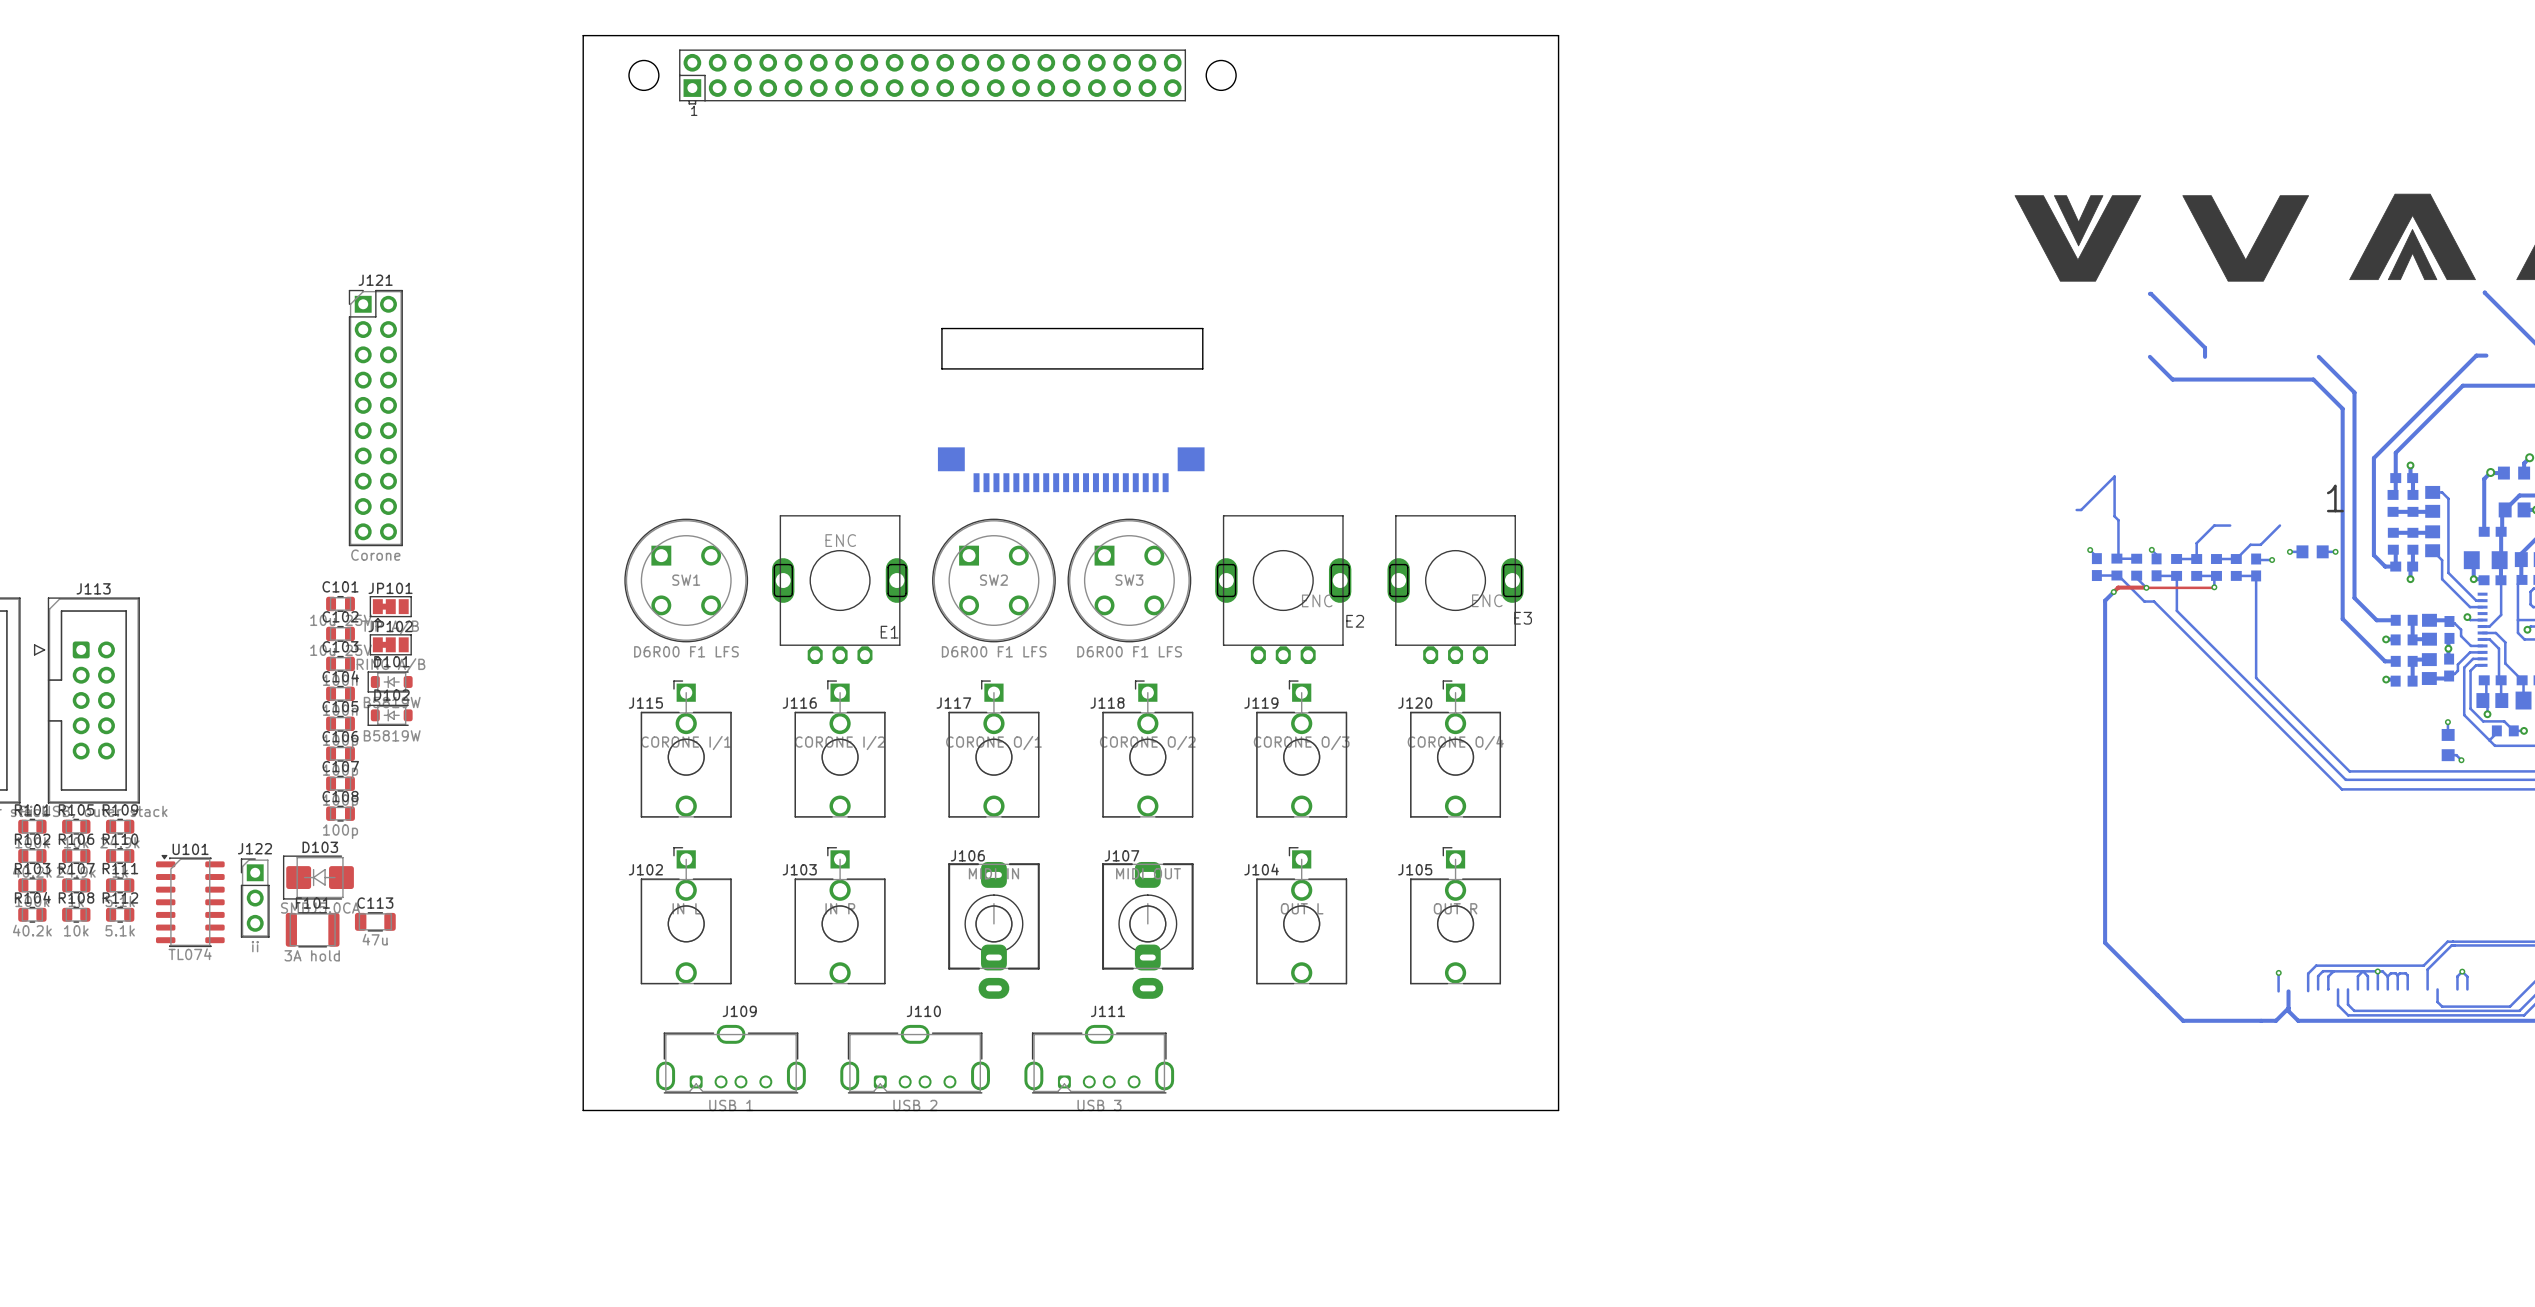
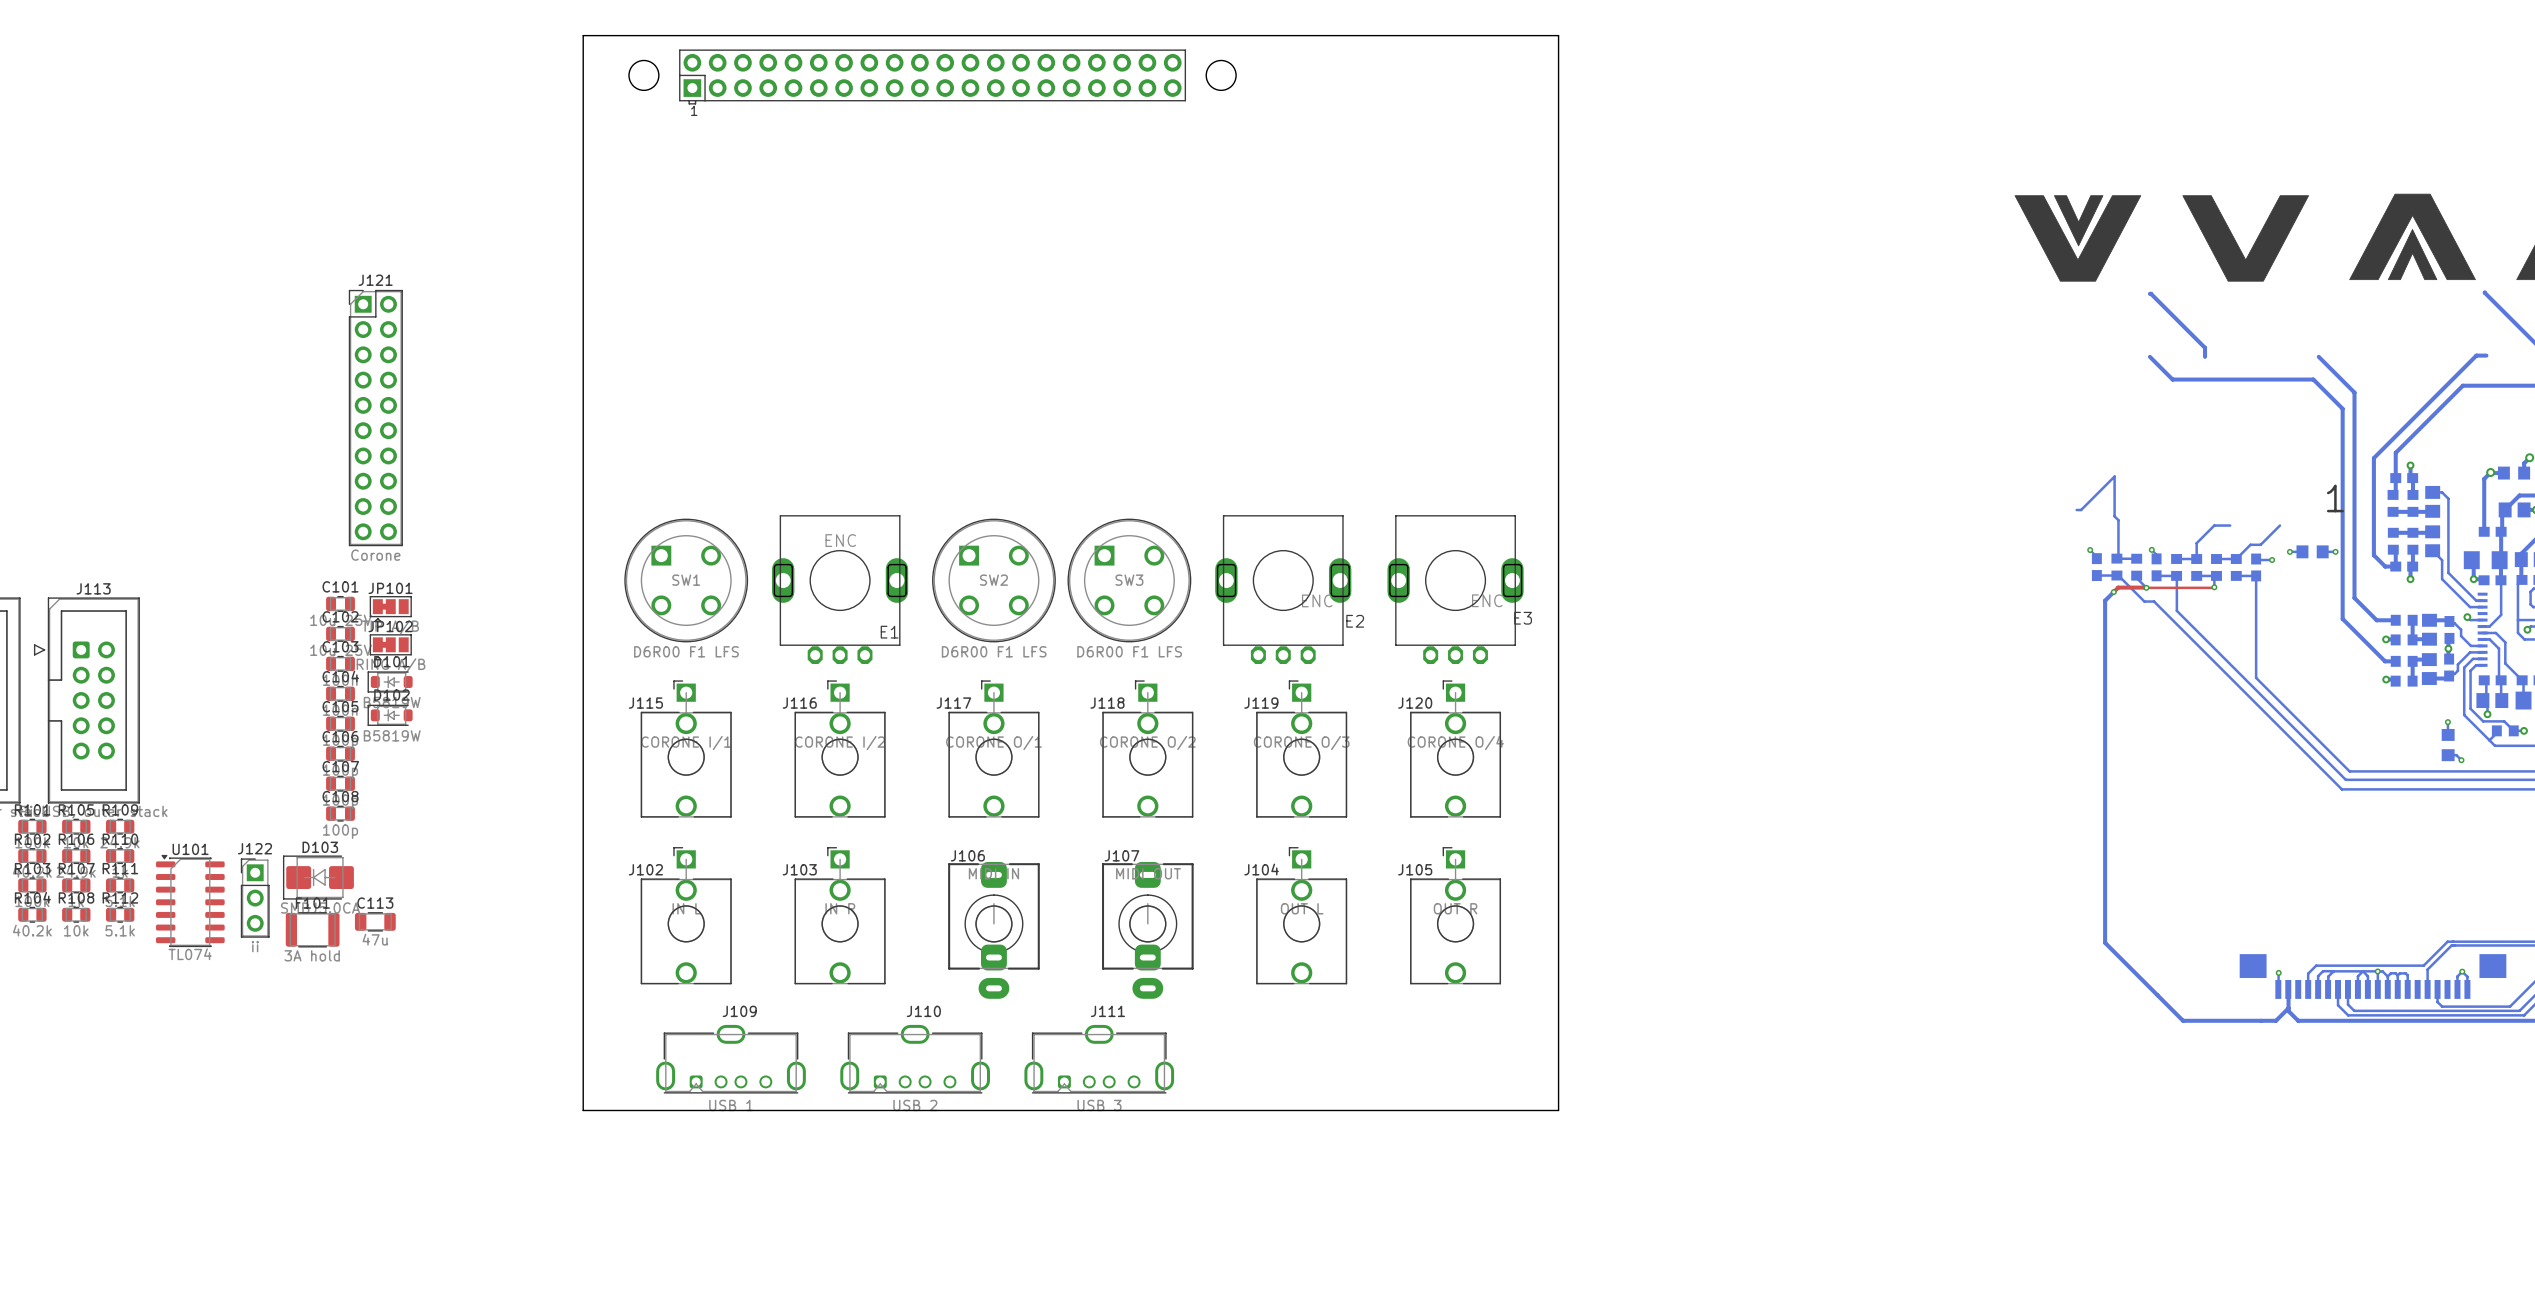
board edge: (941, 328) (1202, 328) (1202, 368) (941, 368) (941, 328) -> none
part: (1071, 469) -> none
part: none -> (2373, 976)

